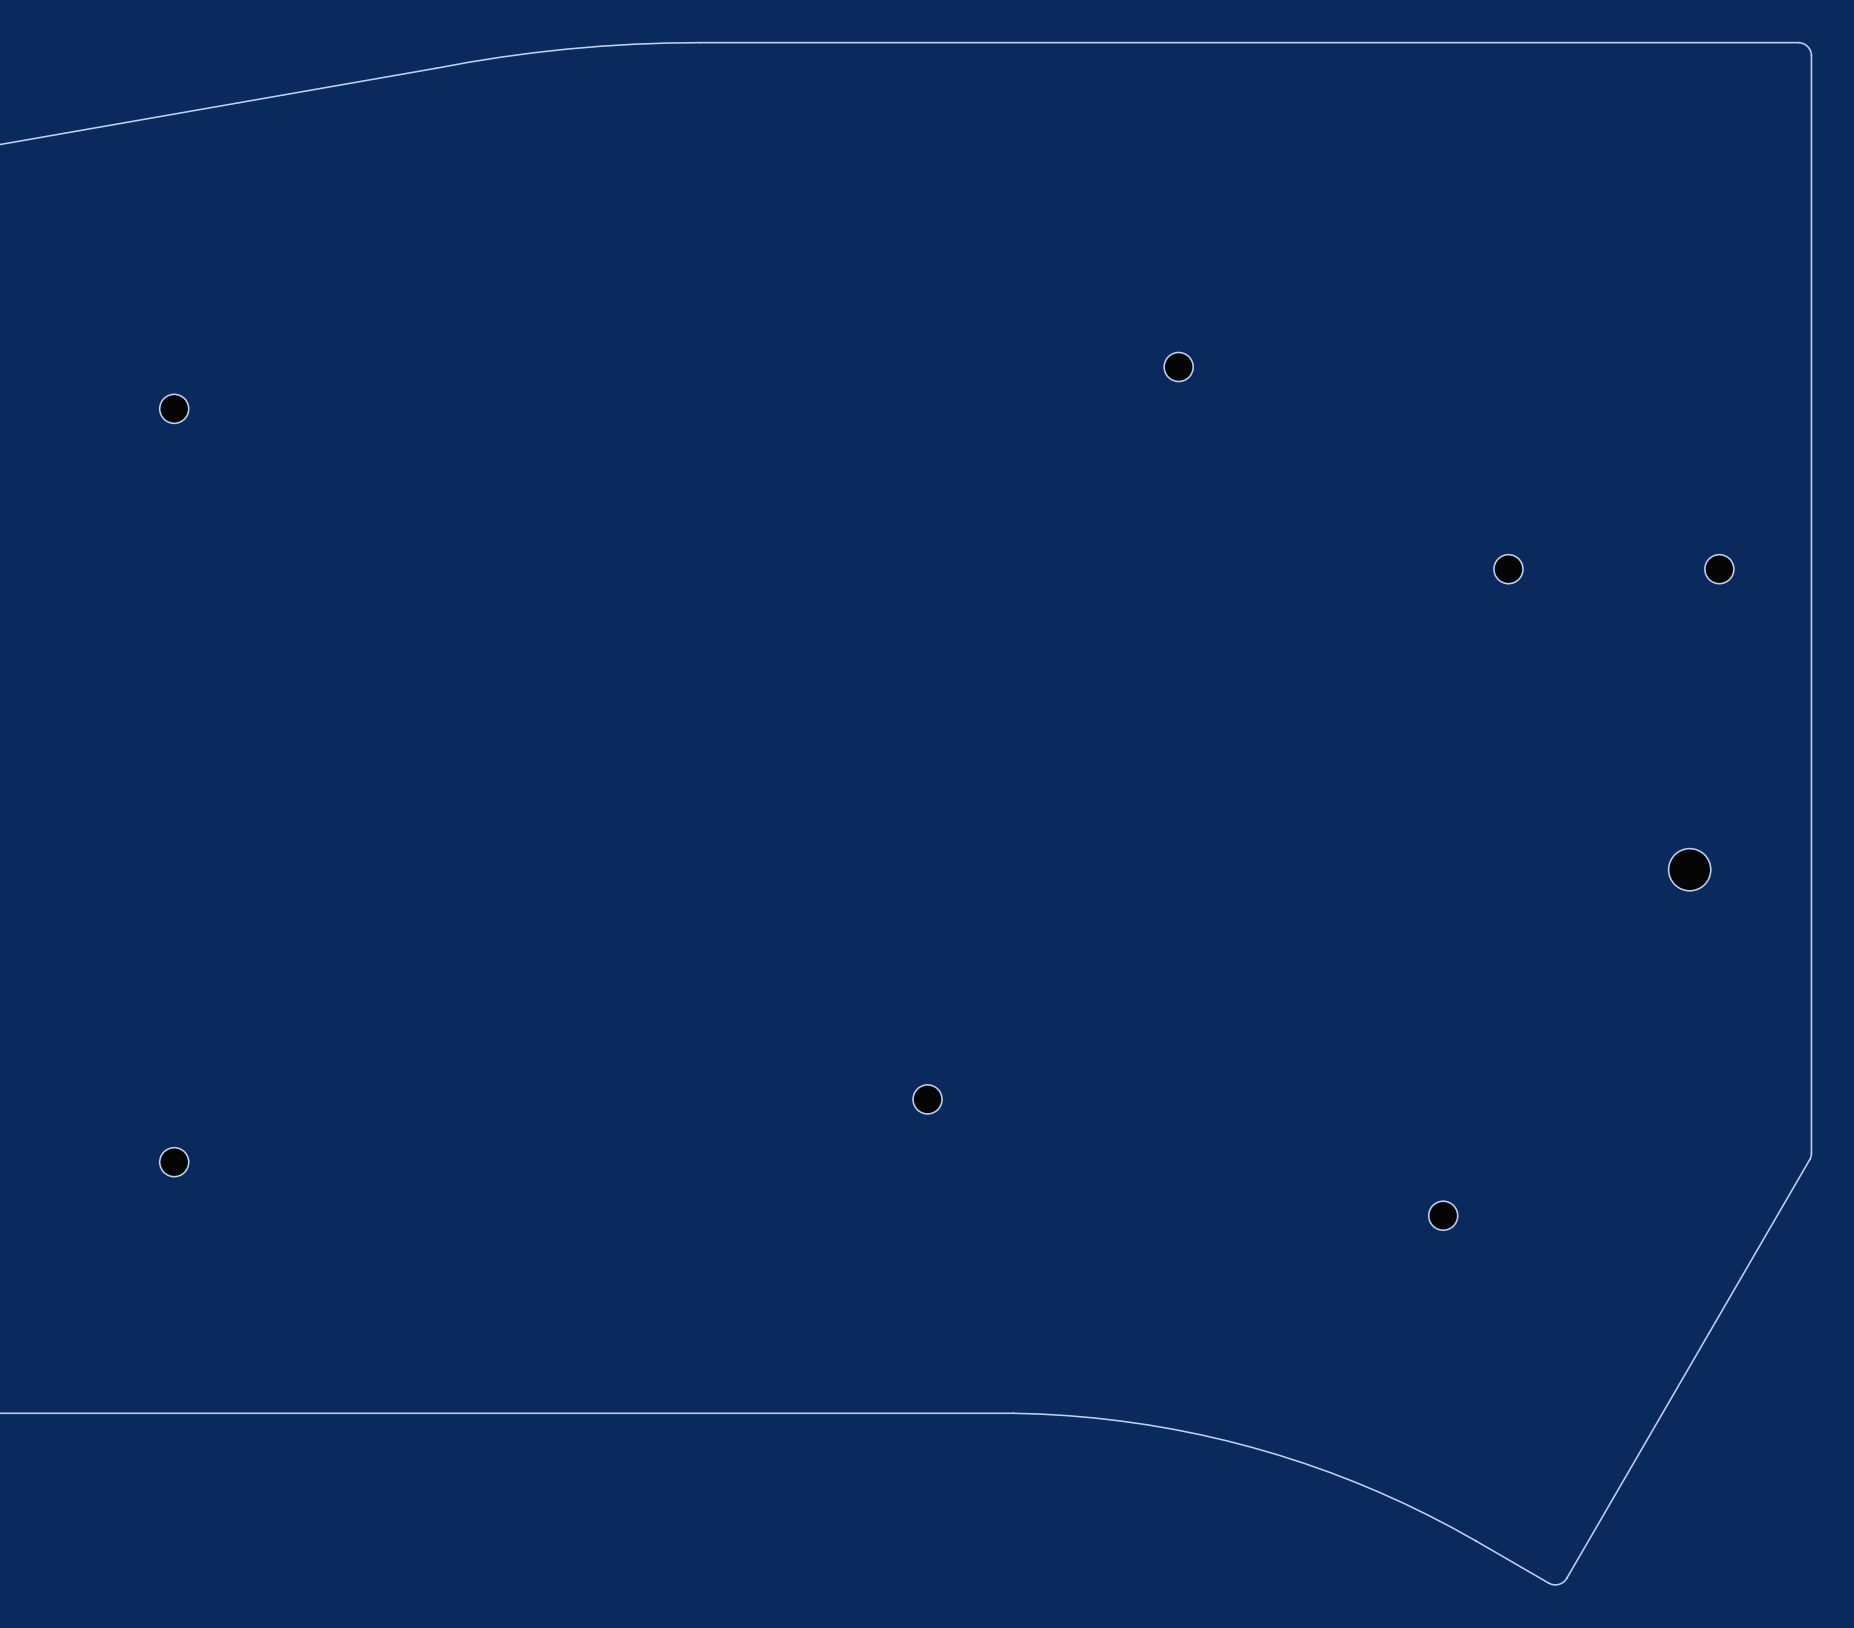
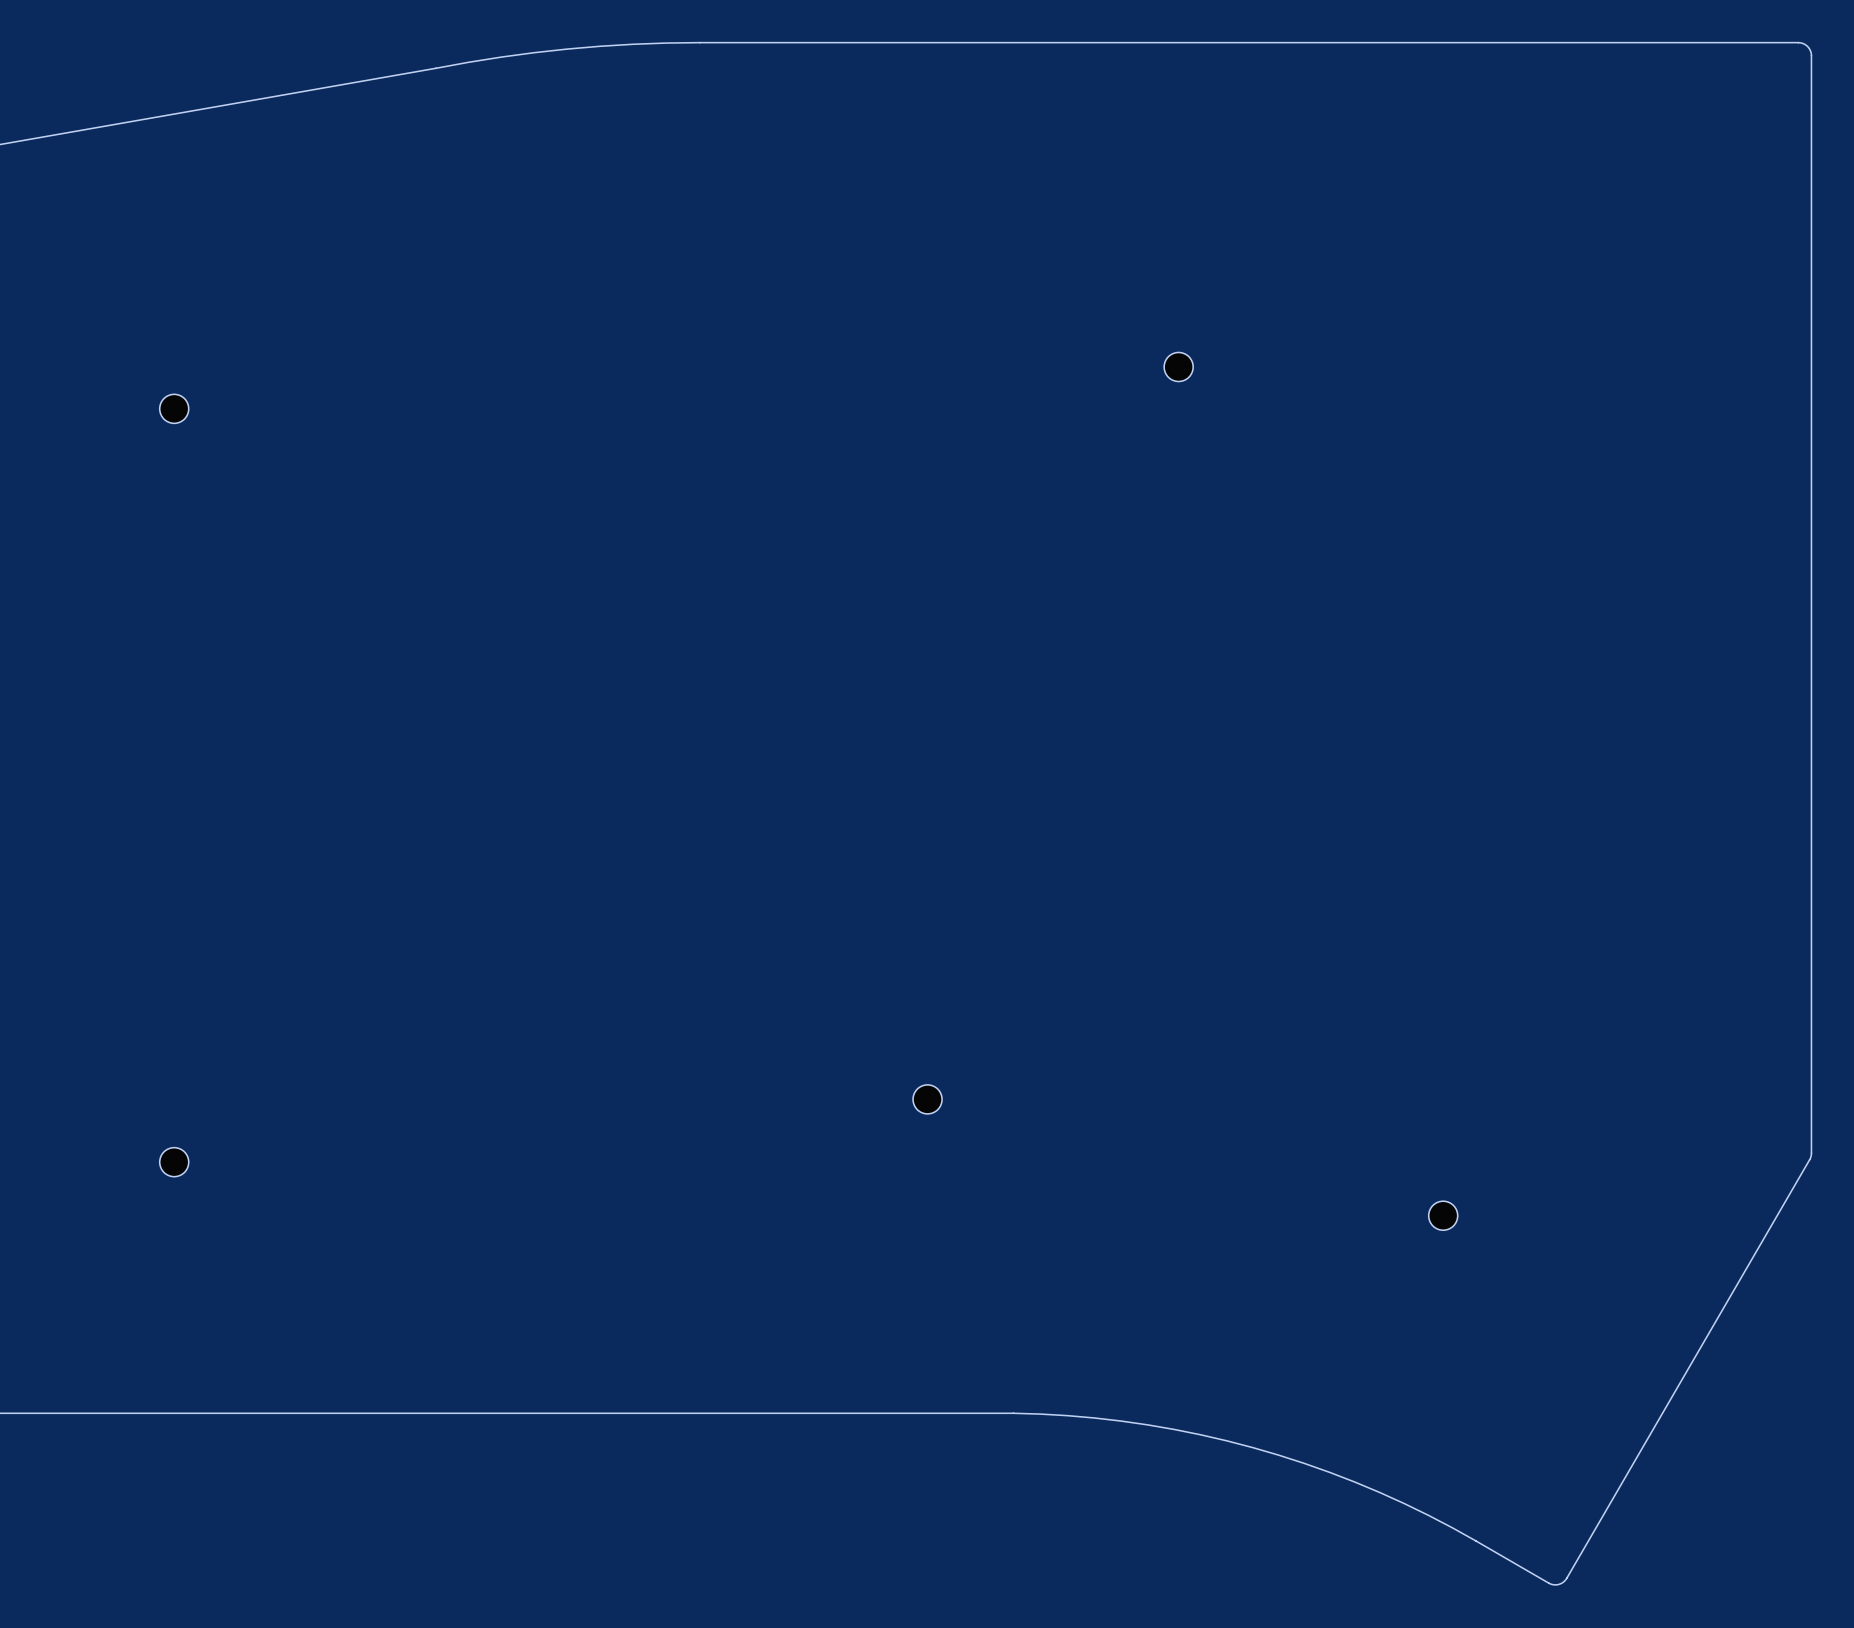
part: (1508, 569) -> none
part: (1719, 569) -> none
part: (1689, 869) -> none

